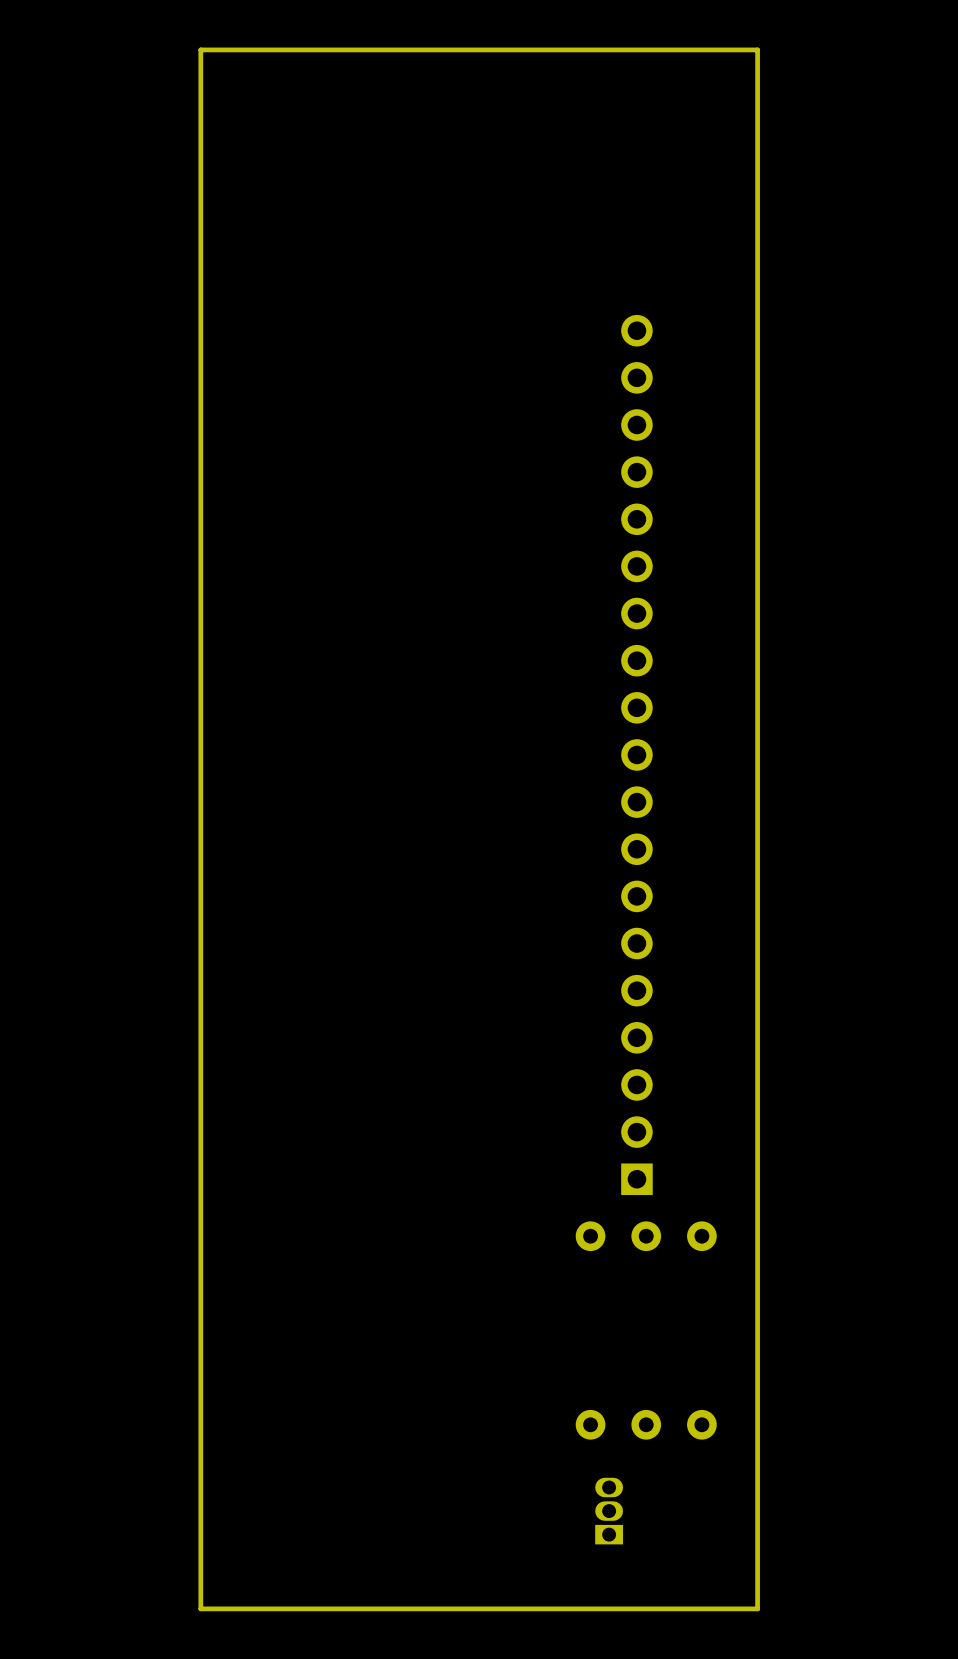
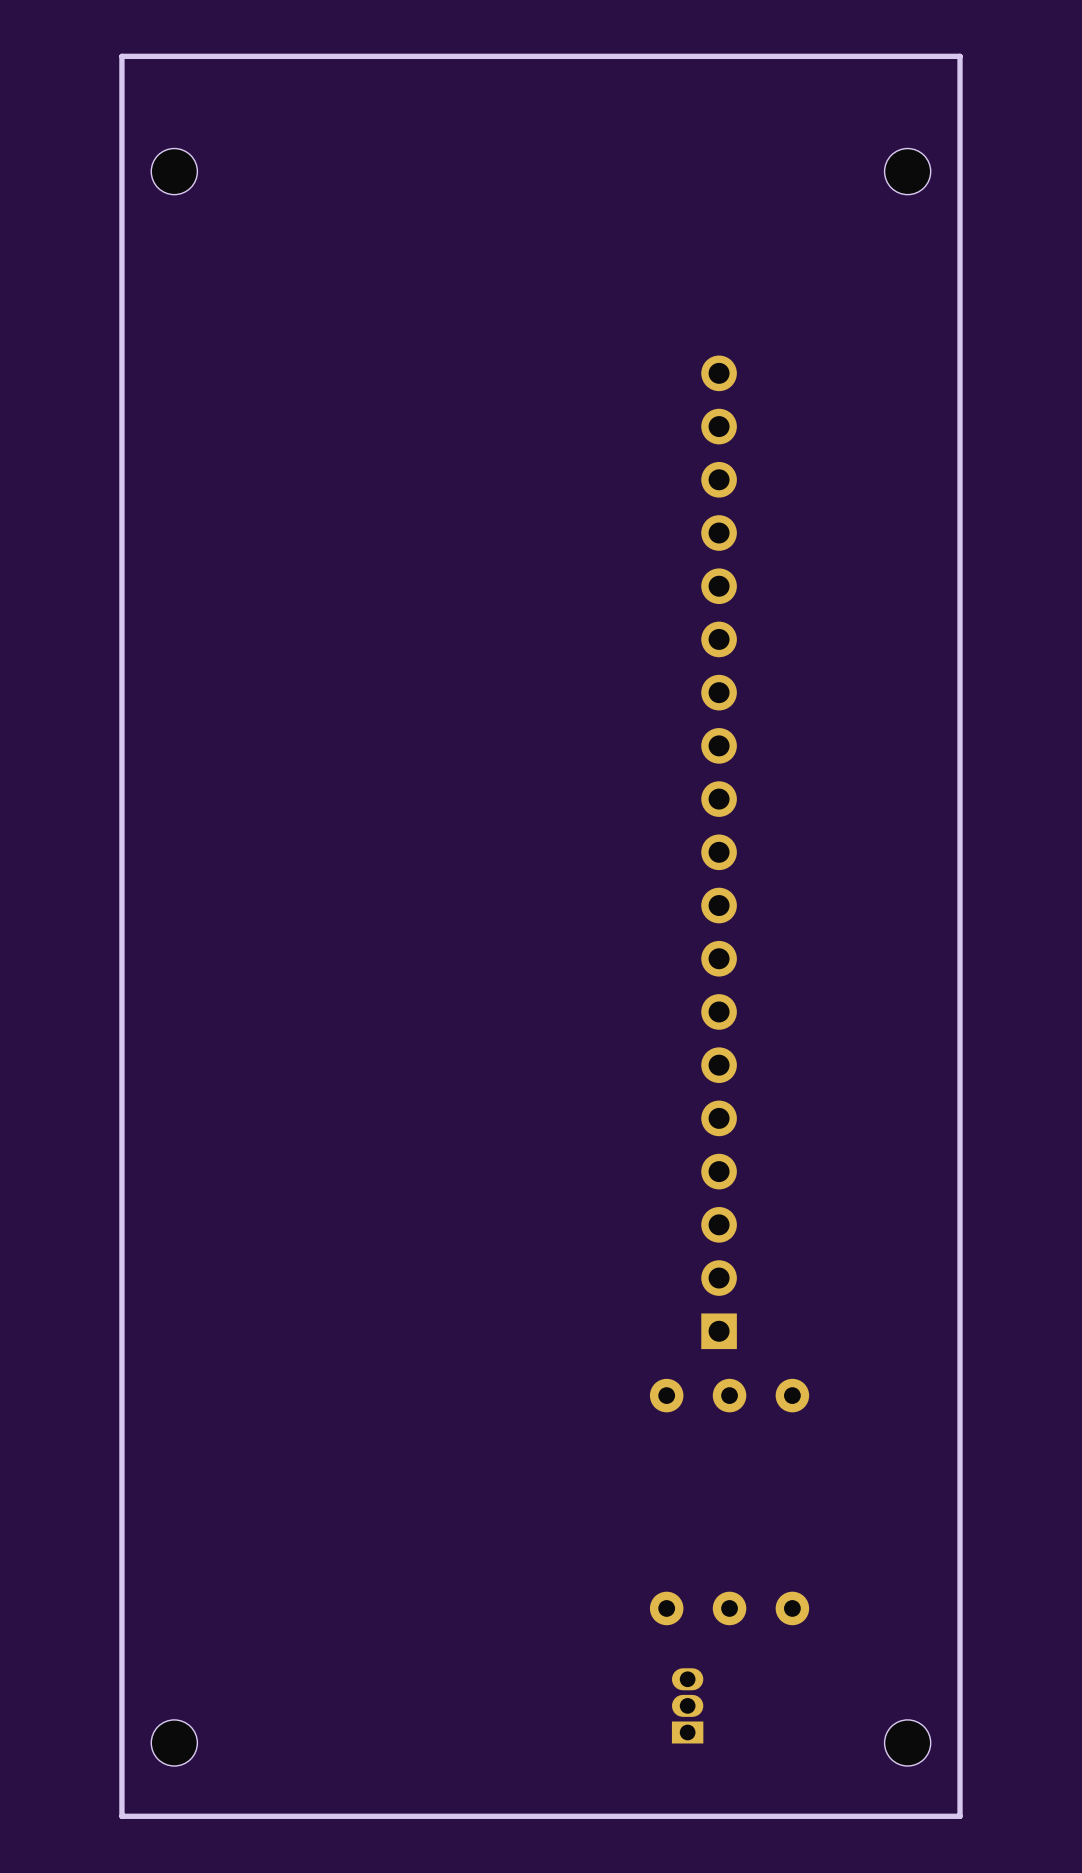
board edge: (200, 49) (200, 1608) -> (226, 56) (121, 56) (121, 1816) (226, 1816)
board edge: (757, 49) (757, 1608) -> (855, 56) (960, 56) (960, 1816) (855, 1816)
part: none -> (174, 171)
part: none -> (907, 171)
part: none -> (174, 1742)
part: none -> (907, 1742)

